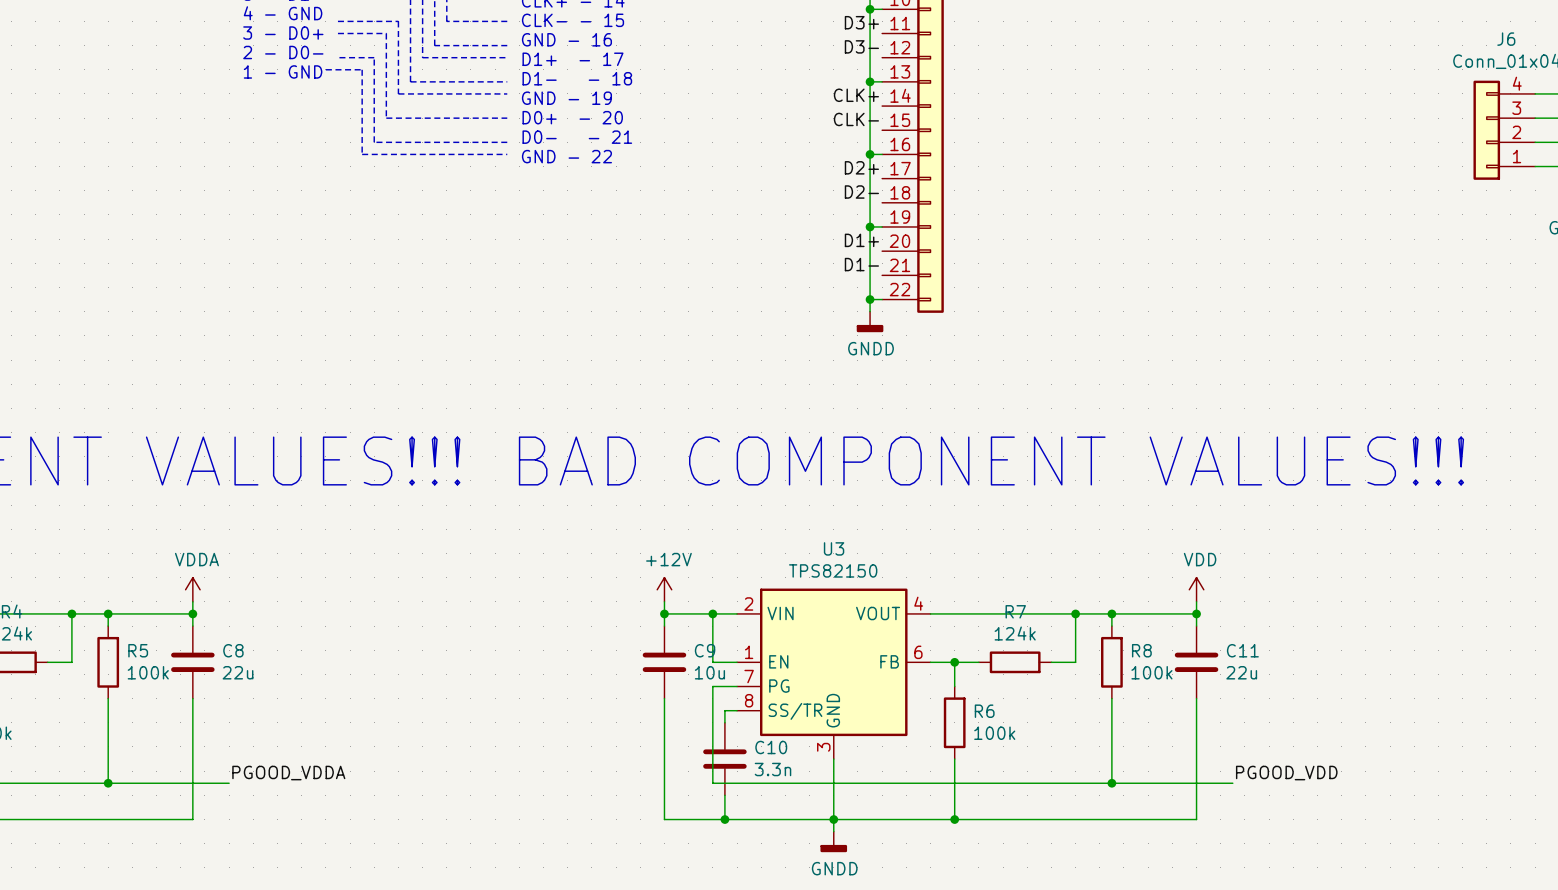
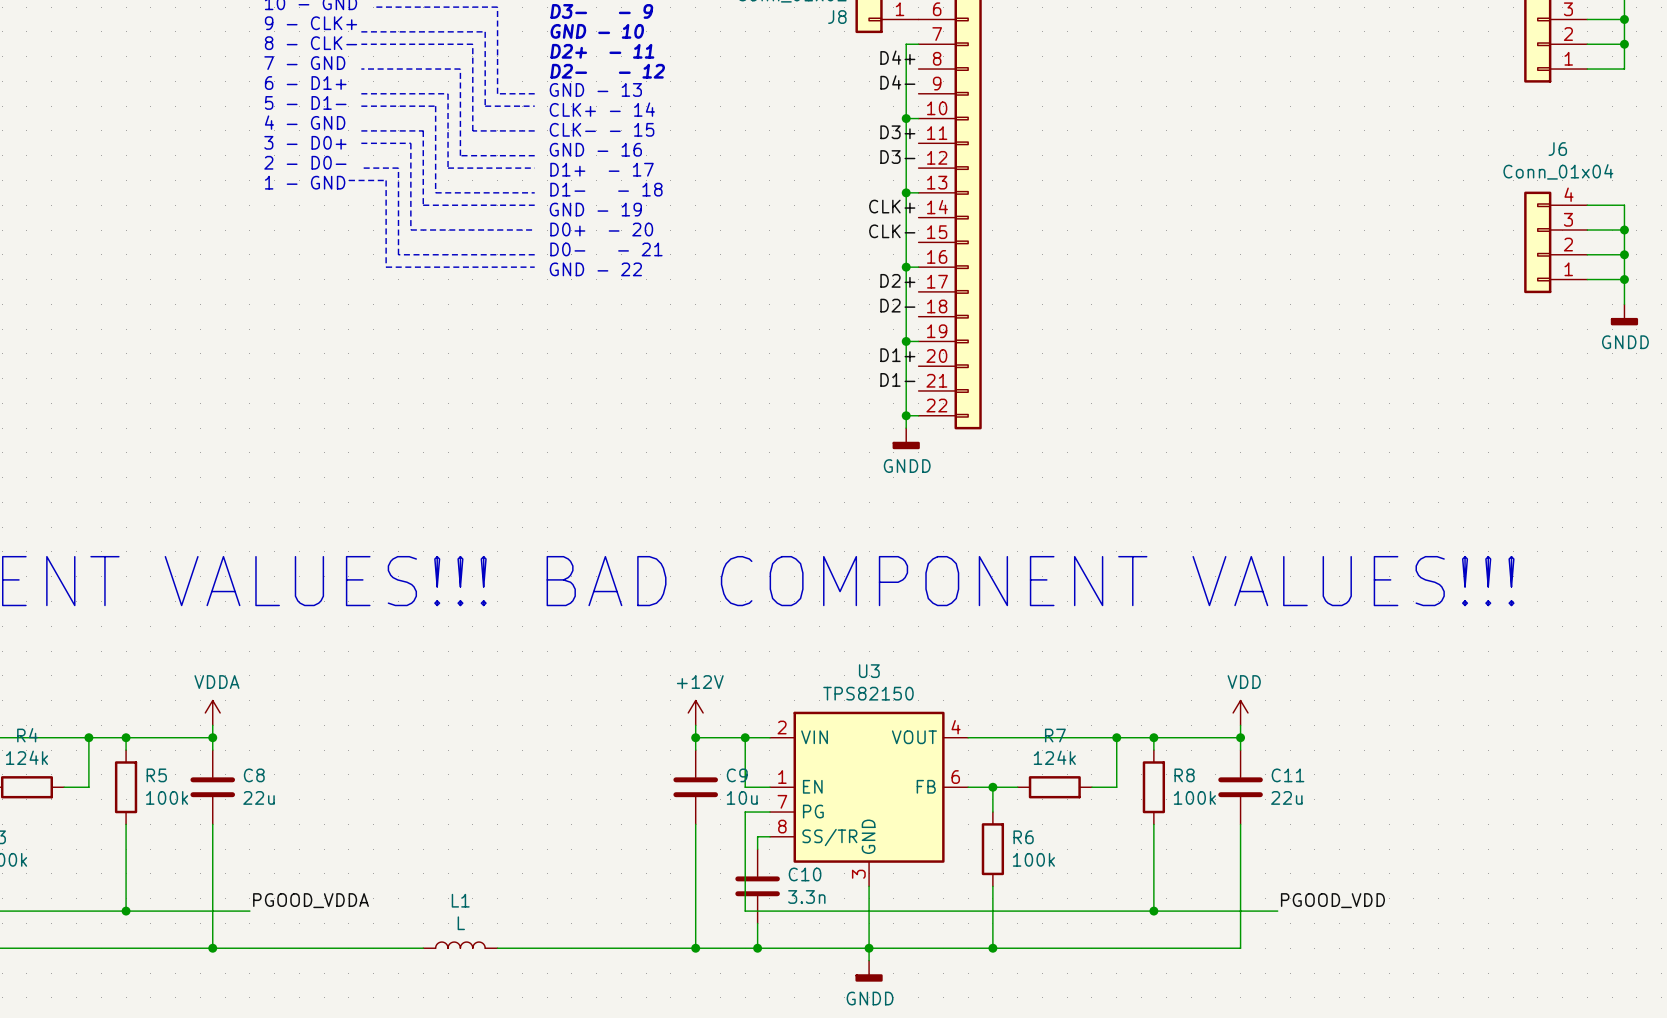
L1: none -> L (460, 945)
wire: none -> (212, 948) (423, 948)
junction: none -> (212, 948)
wire: none -> (497, 948) (695, 948)
junction: none -> (695, 948)

